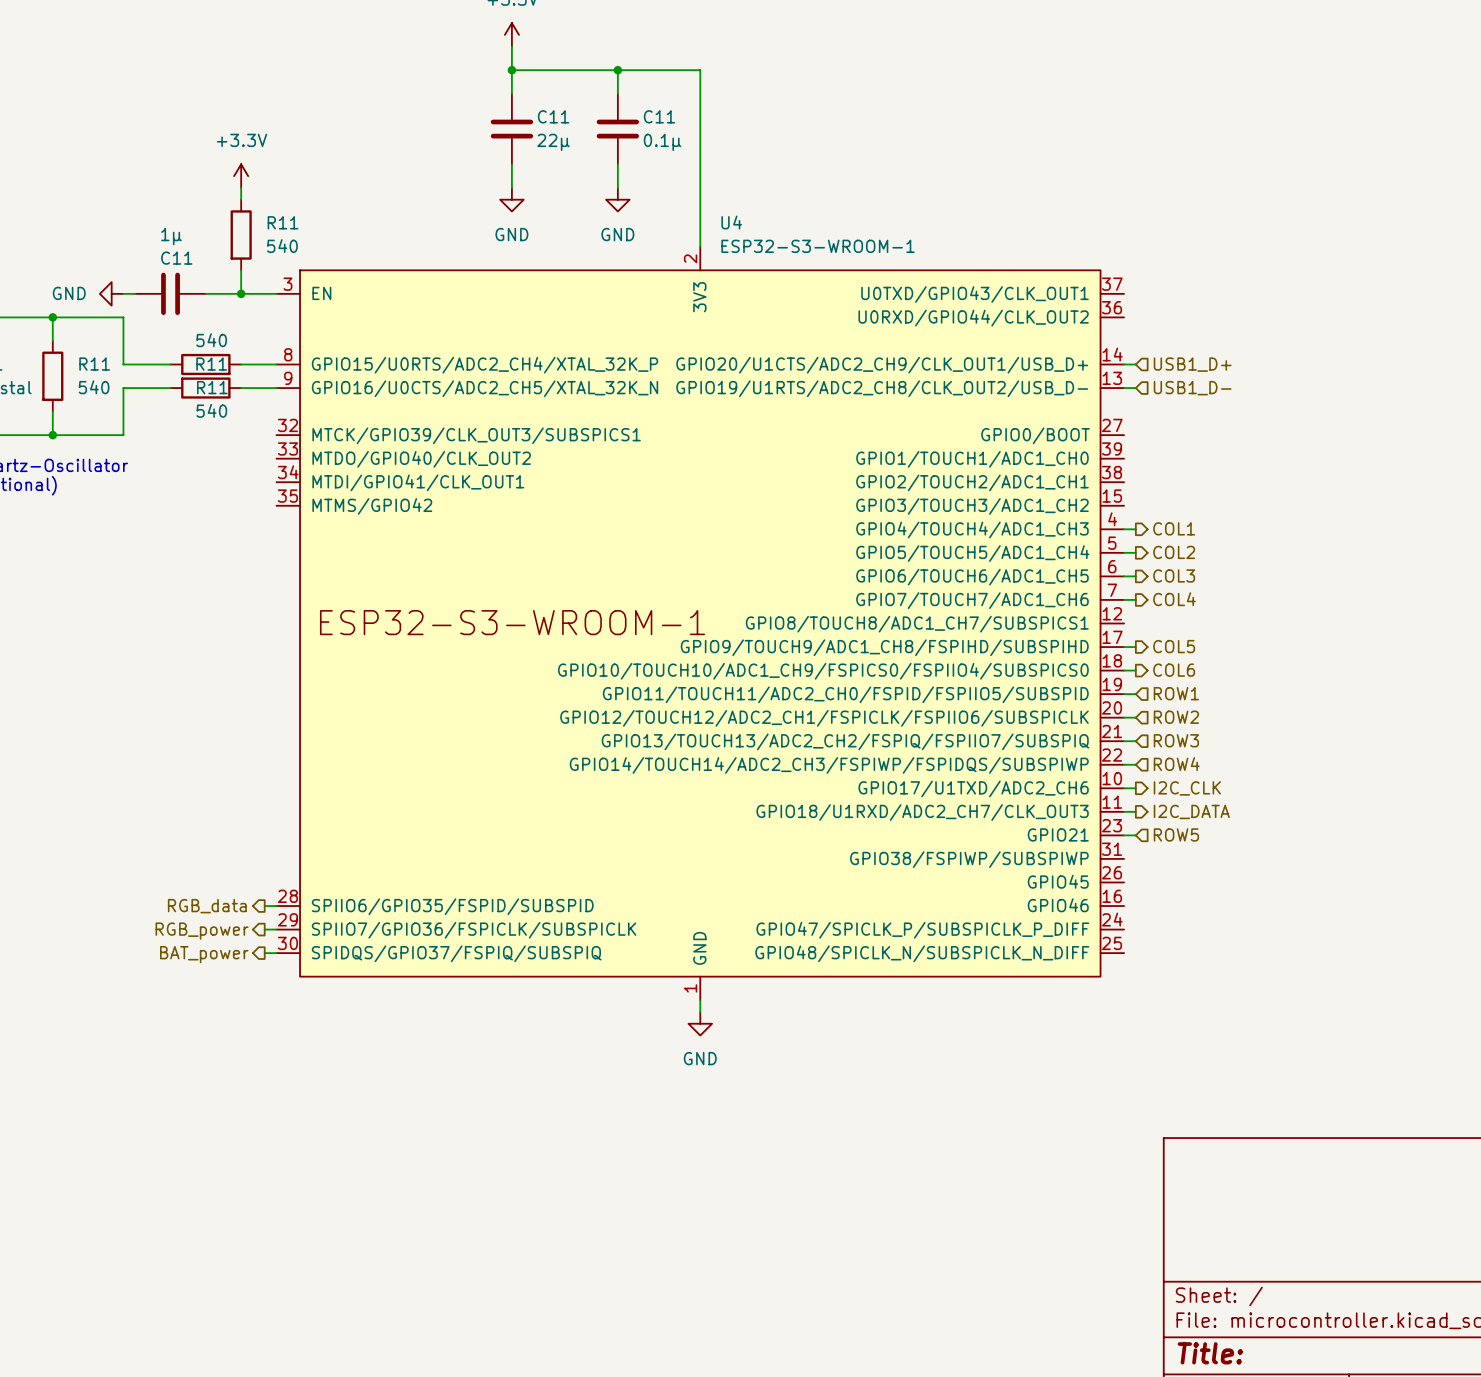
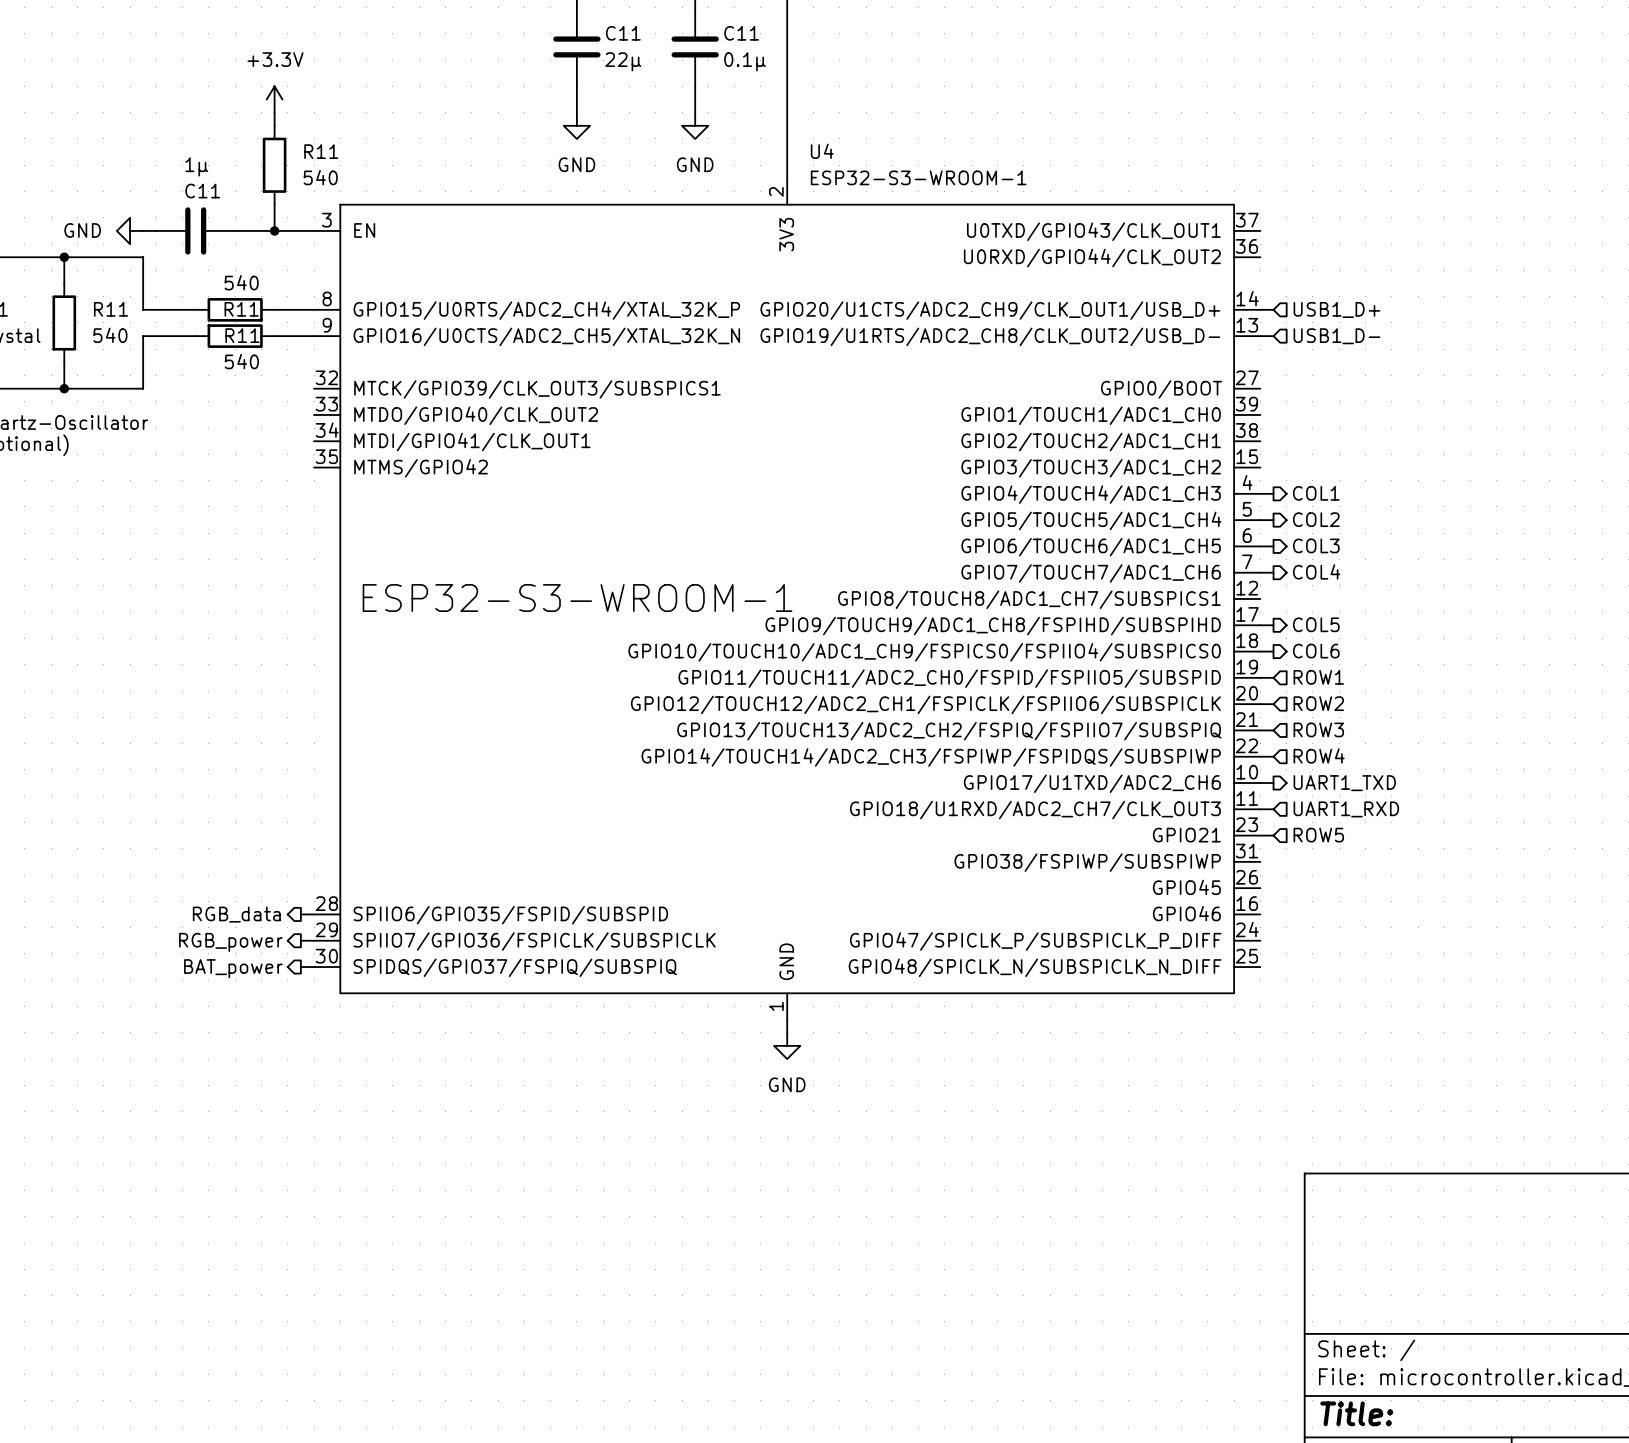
hierarchical label: I2C_CLK (1187, 788) -> UART1_TXD (1344, 783)
hierarchical label shape: output (1191, 811) -> input (1346, 809)
hierarchical label: I2C_DATA (1191, 811) -> UART1_RXD (1346, 809)

